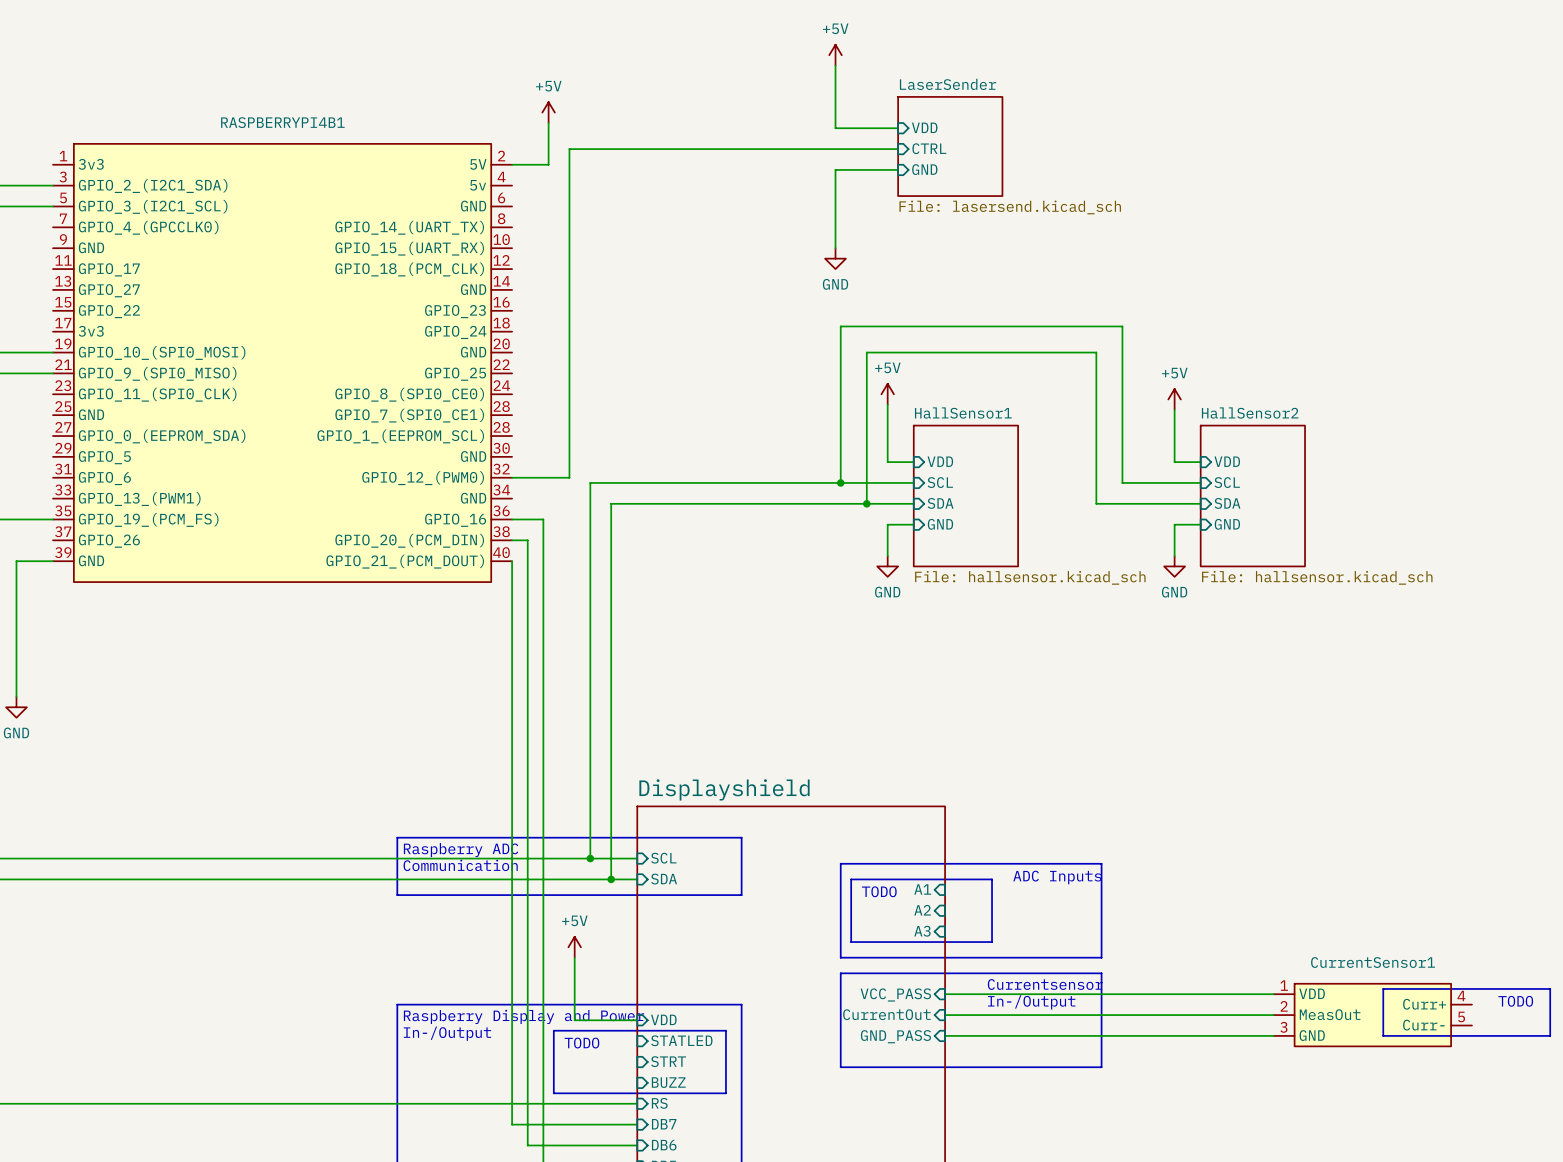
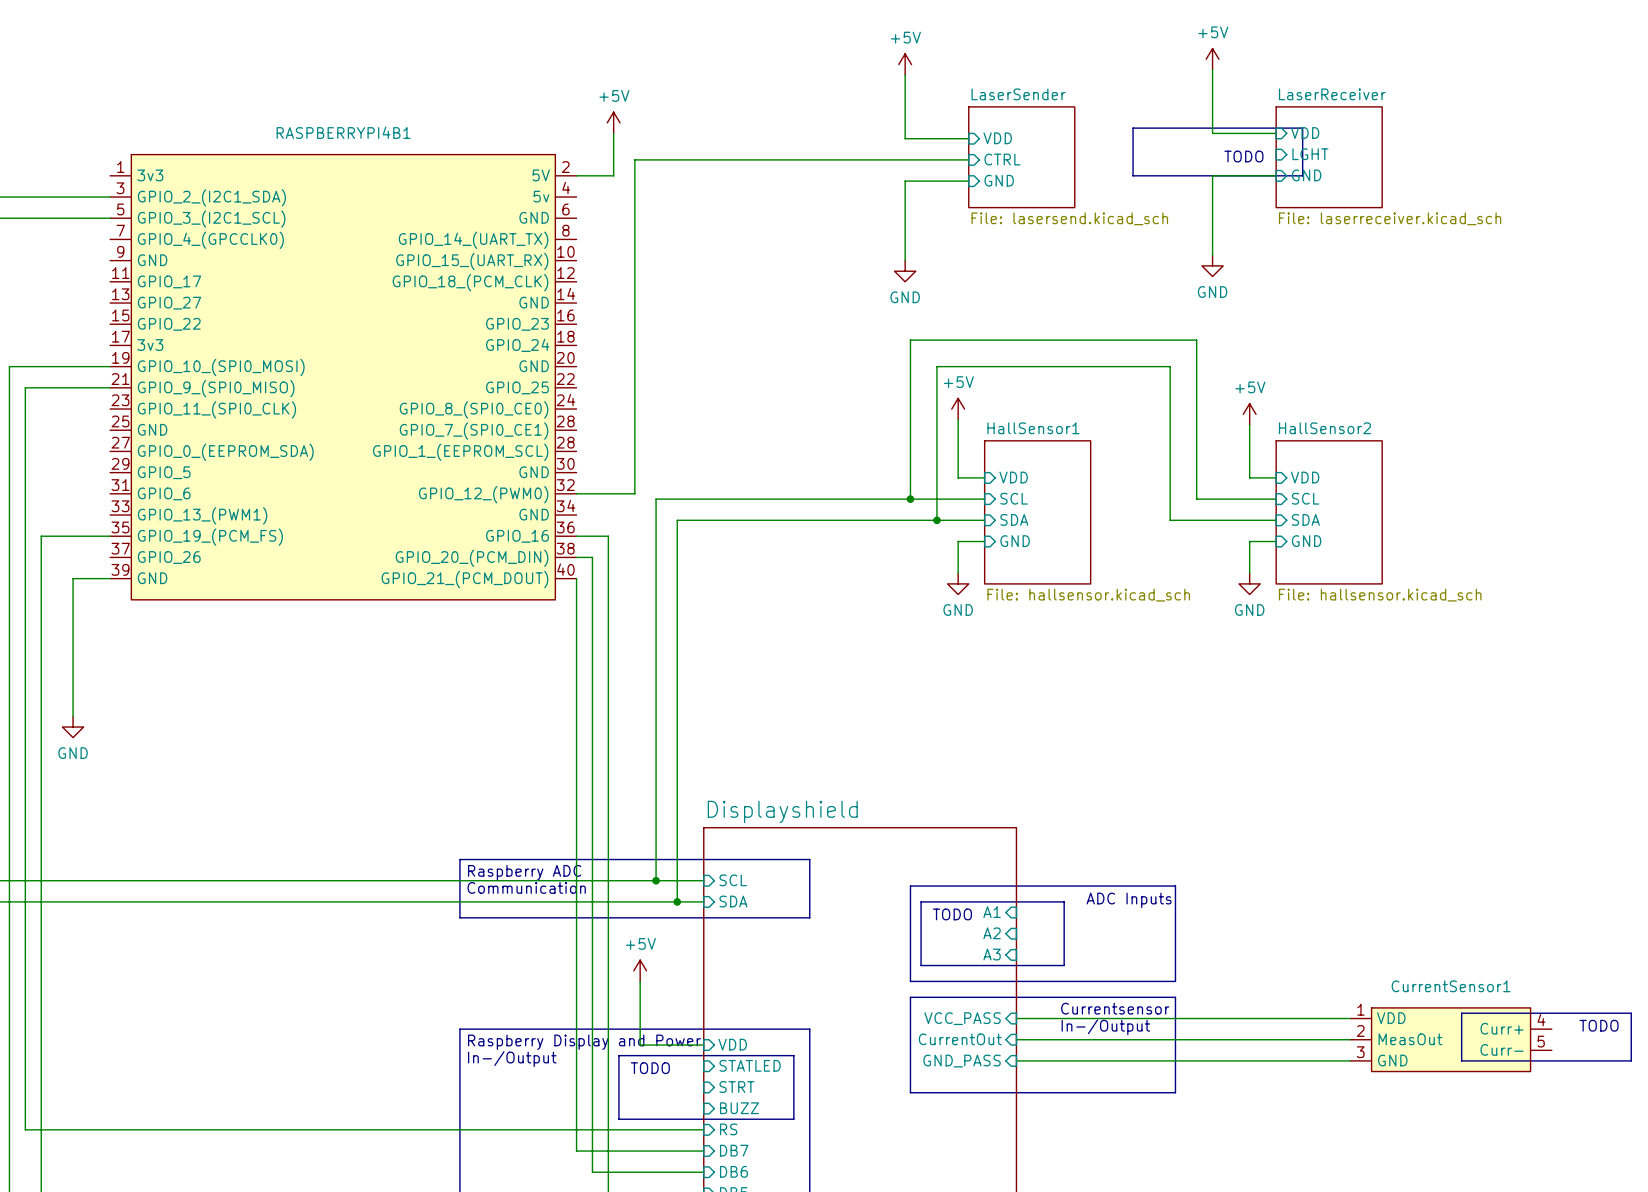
power symbol: none -> +5V (1212, 59)
wire: none -> (1212, 69) (1212, 133) (1276, 133)
line: none -> (1133, 128) (1302, 128) (1302, 175) (1133, 175) (1133, 128)
sheet pin: none -> VDD (1305, 133)
sheet pin: none -> LGHT (1310, 154)
text: none -> TODO (1243, 156)
sheet LaserReceiver: none -> File: laserreceiver.kicad_sch (1329, 157)
wire: none -> (1276, 175) (1212, 175) (1212, 255)
sheet pin: none -> GND (1306, 175)
power symbol: none -> GND (1212, 265)

